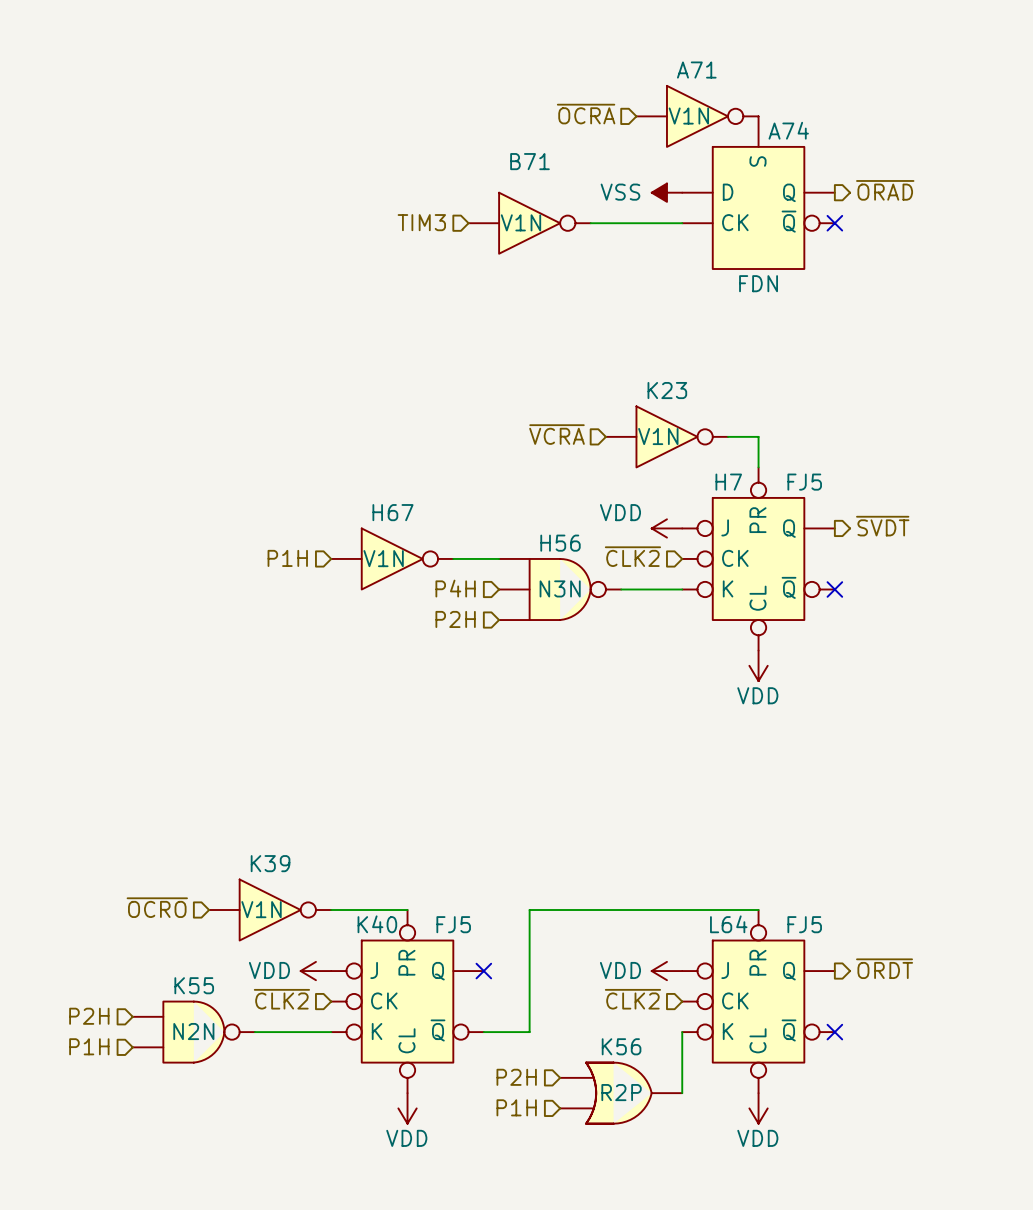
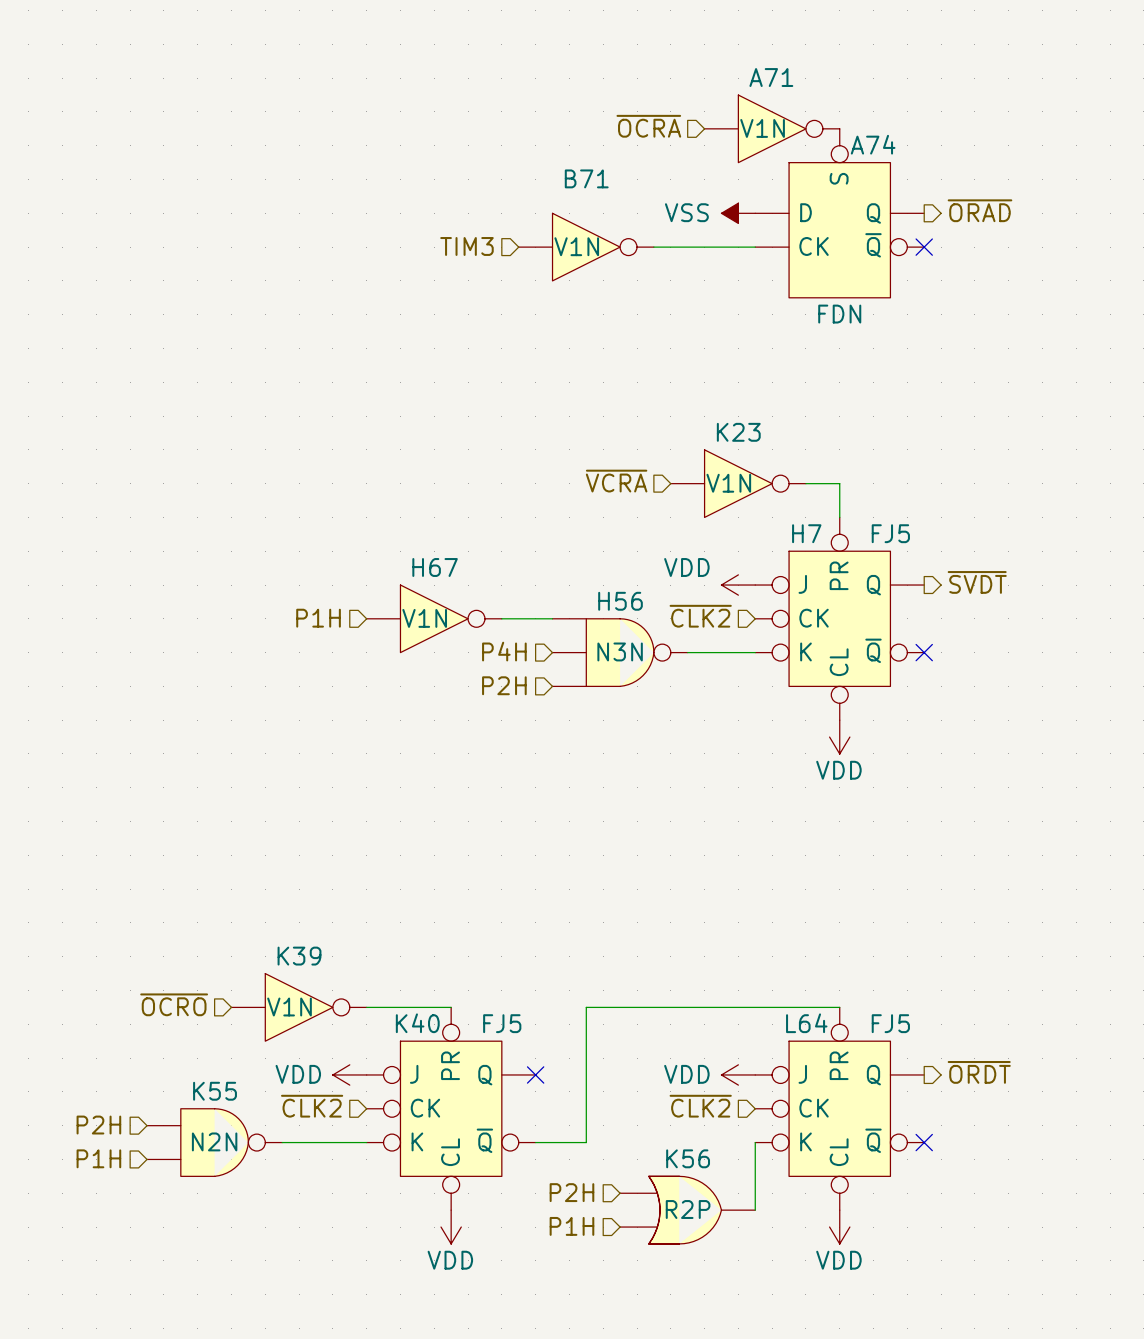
A74 symbol: [682, 116, 835, 270] -> [755, 128, 925, 298]

